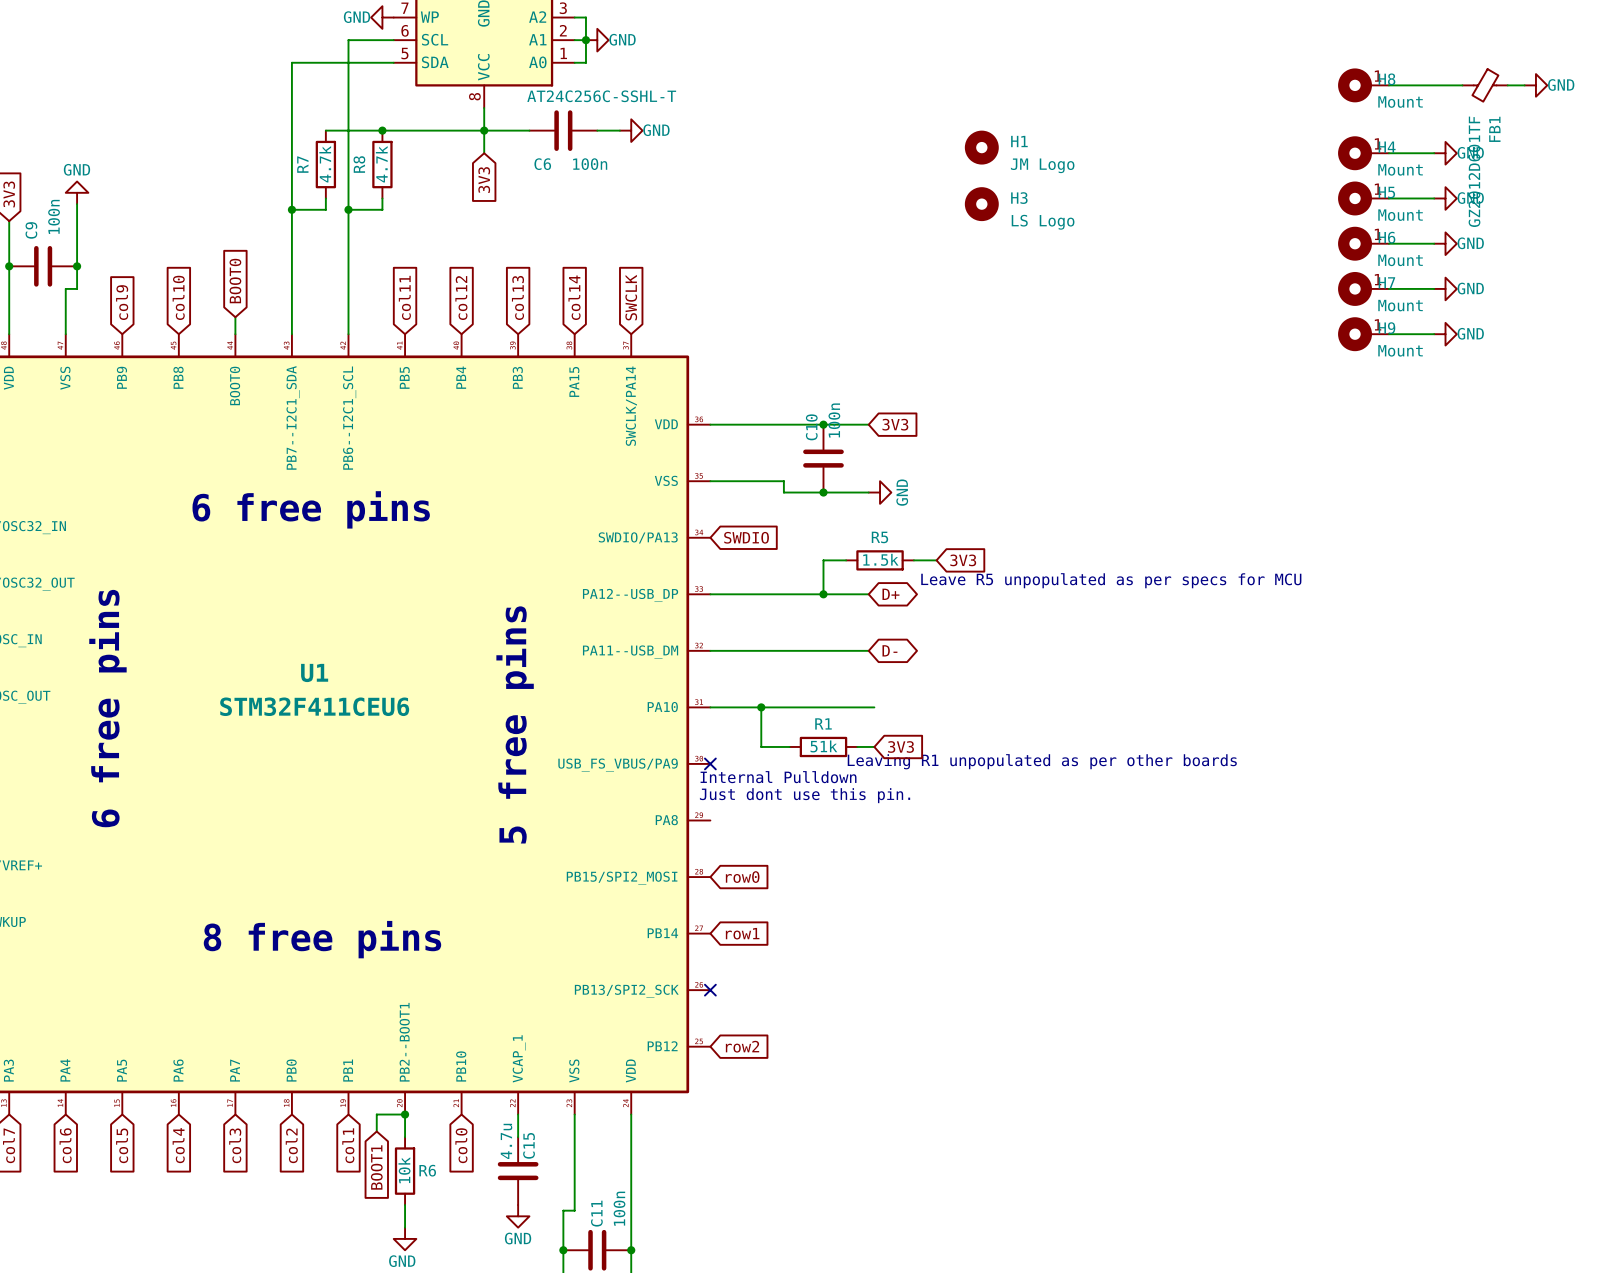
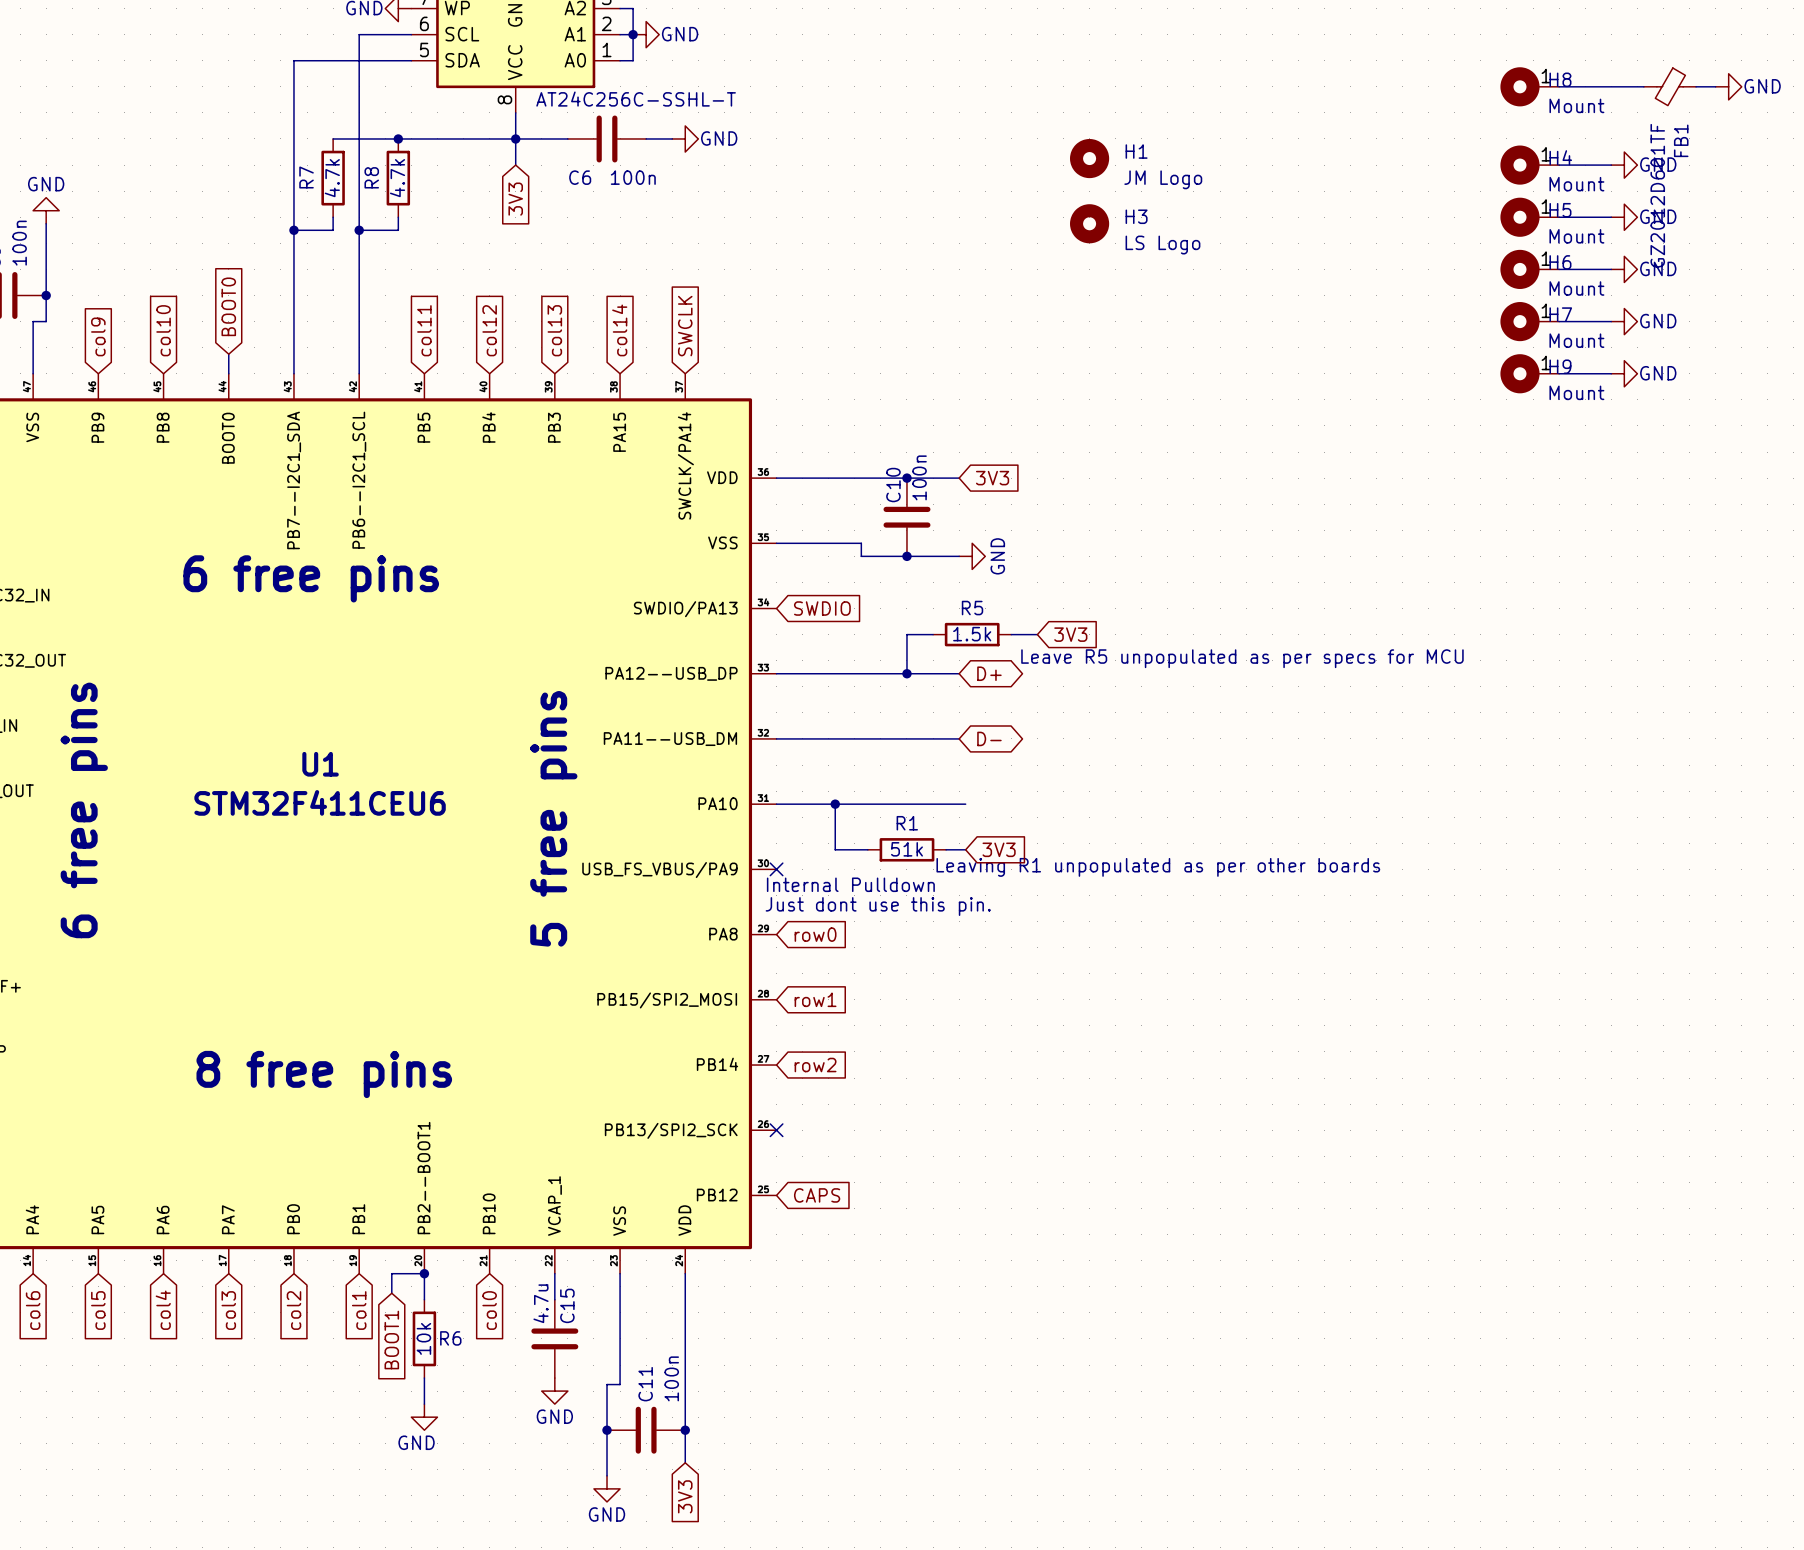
global label: none -> row0 (815, 934)
global label: row0 (742, 877) -> row1 (815, 999)
global label: row1 (742, 933) -> row2 (815, 1065)
global label: row2 (742, 1046) -> CAPS (817, 1195)

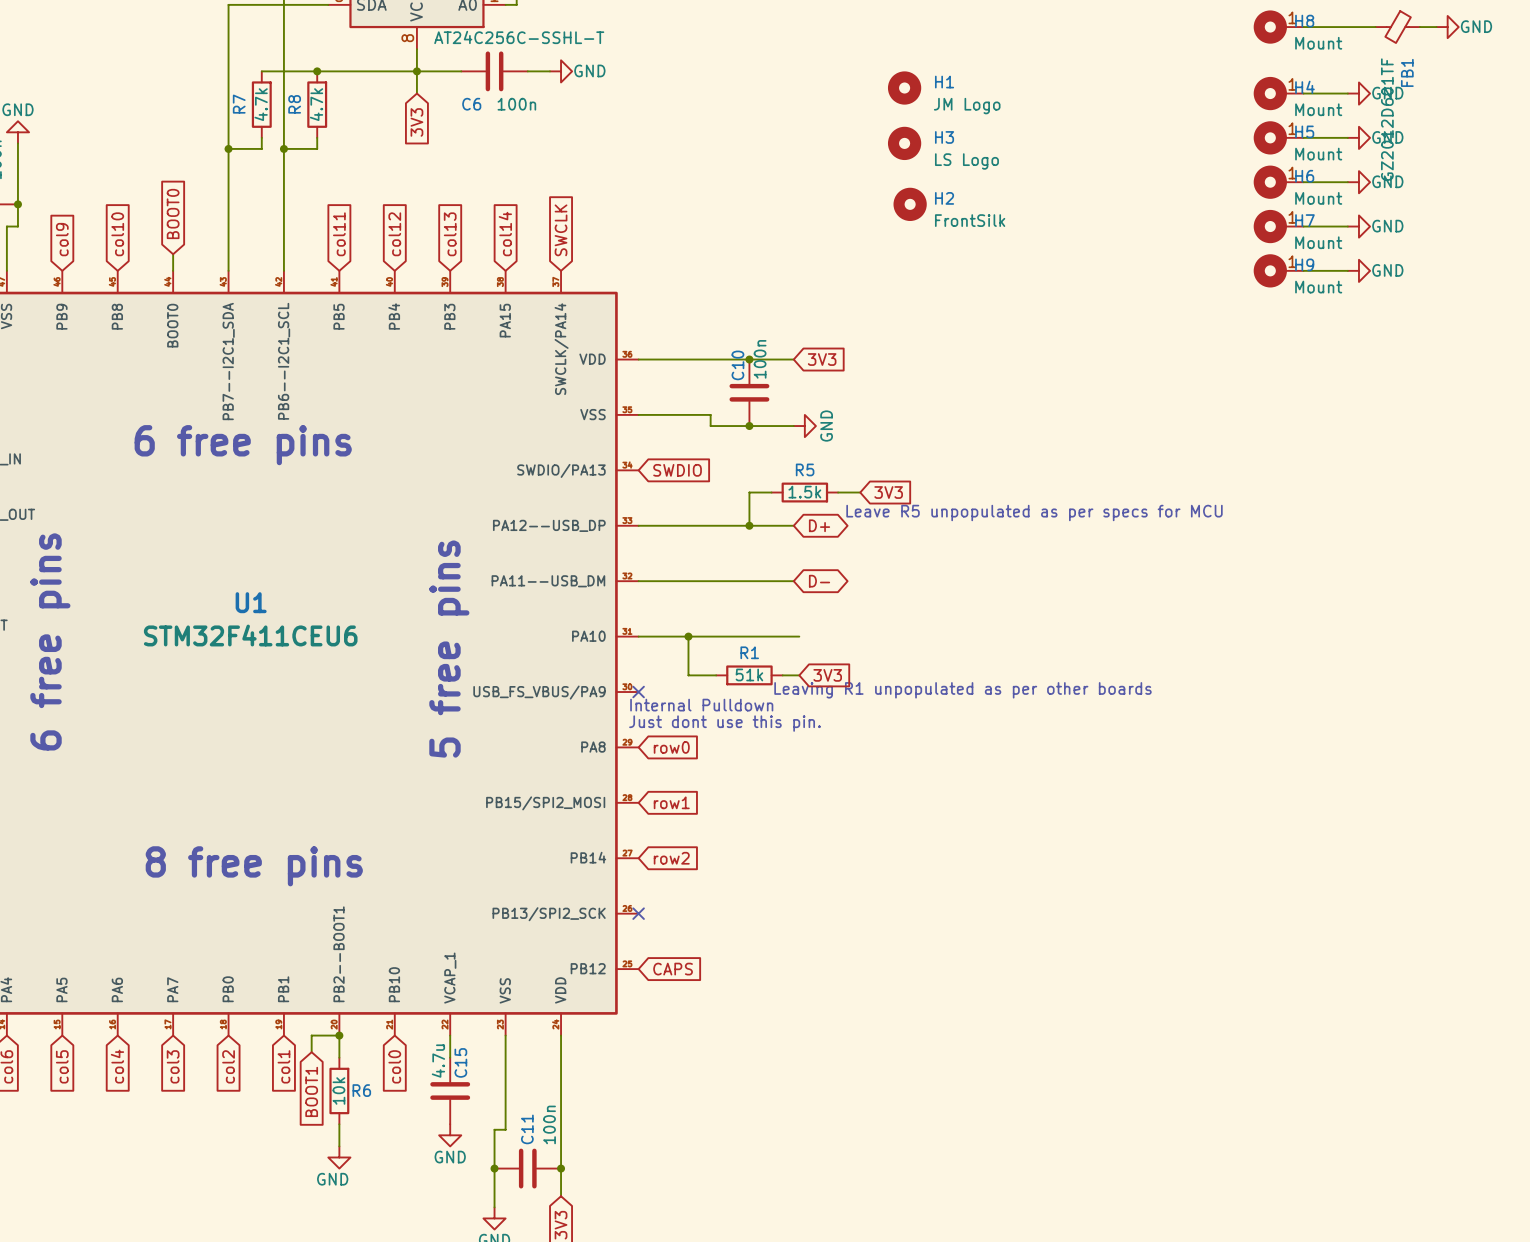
H2: none -> FrontSilk (910, 204)

